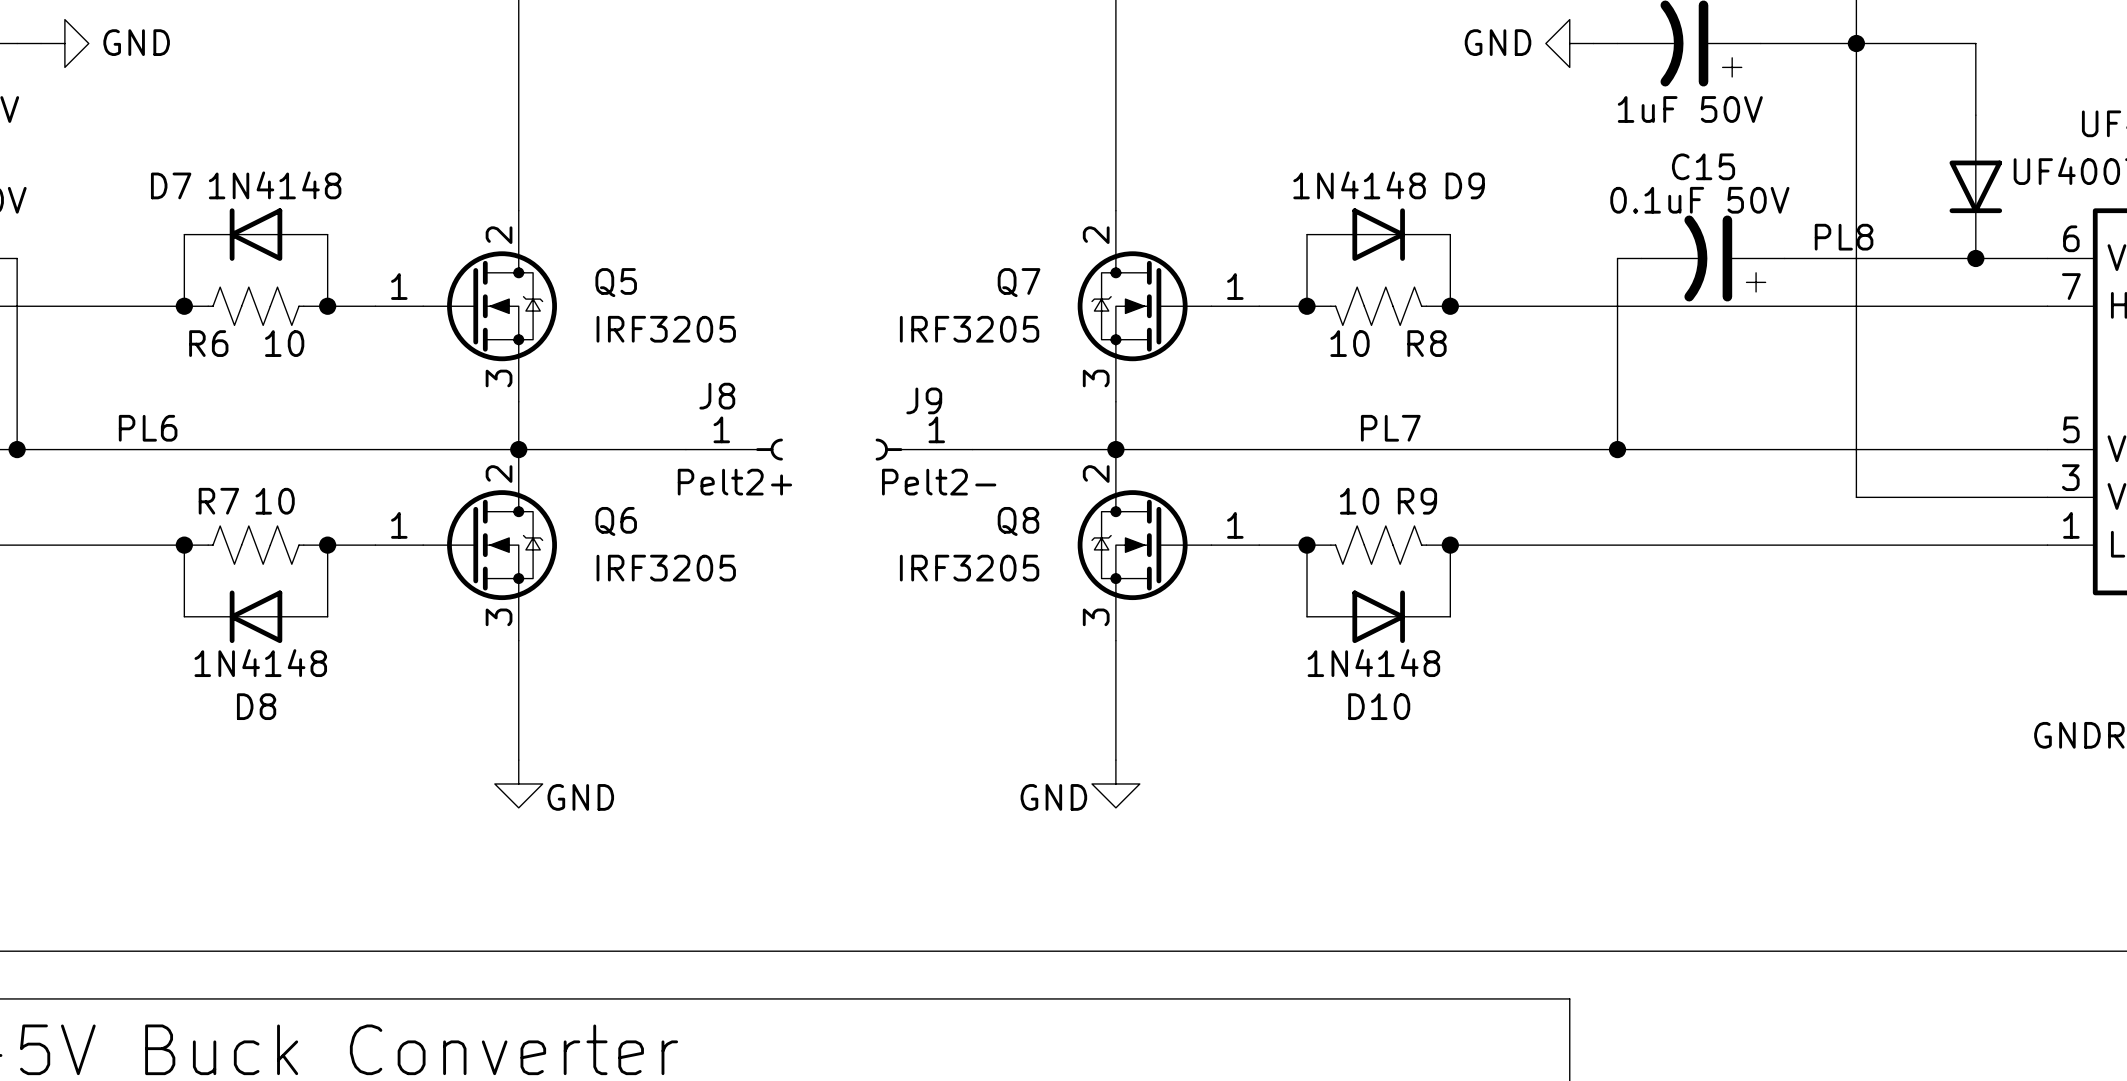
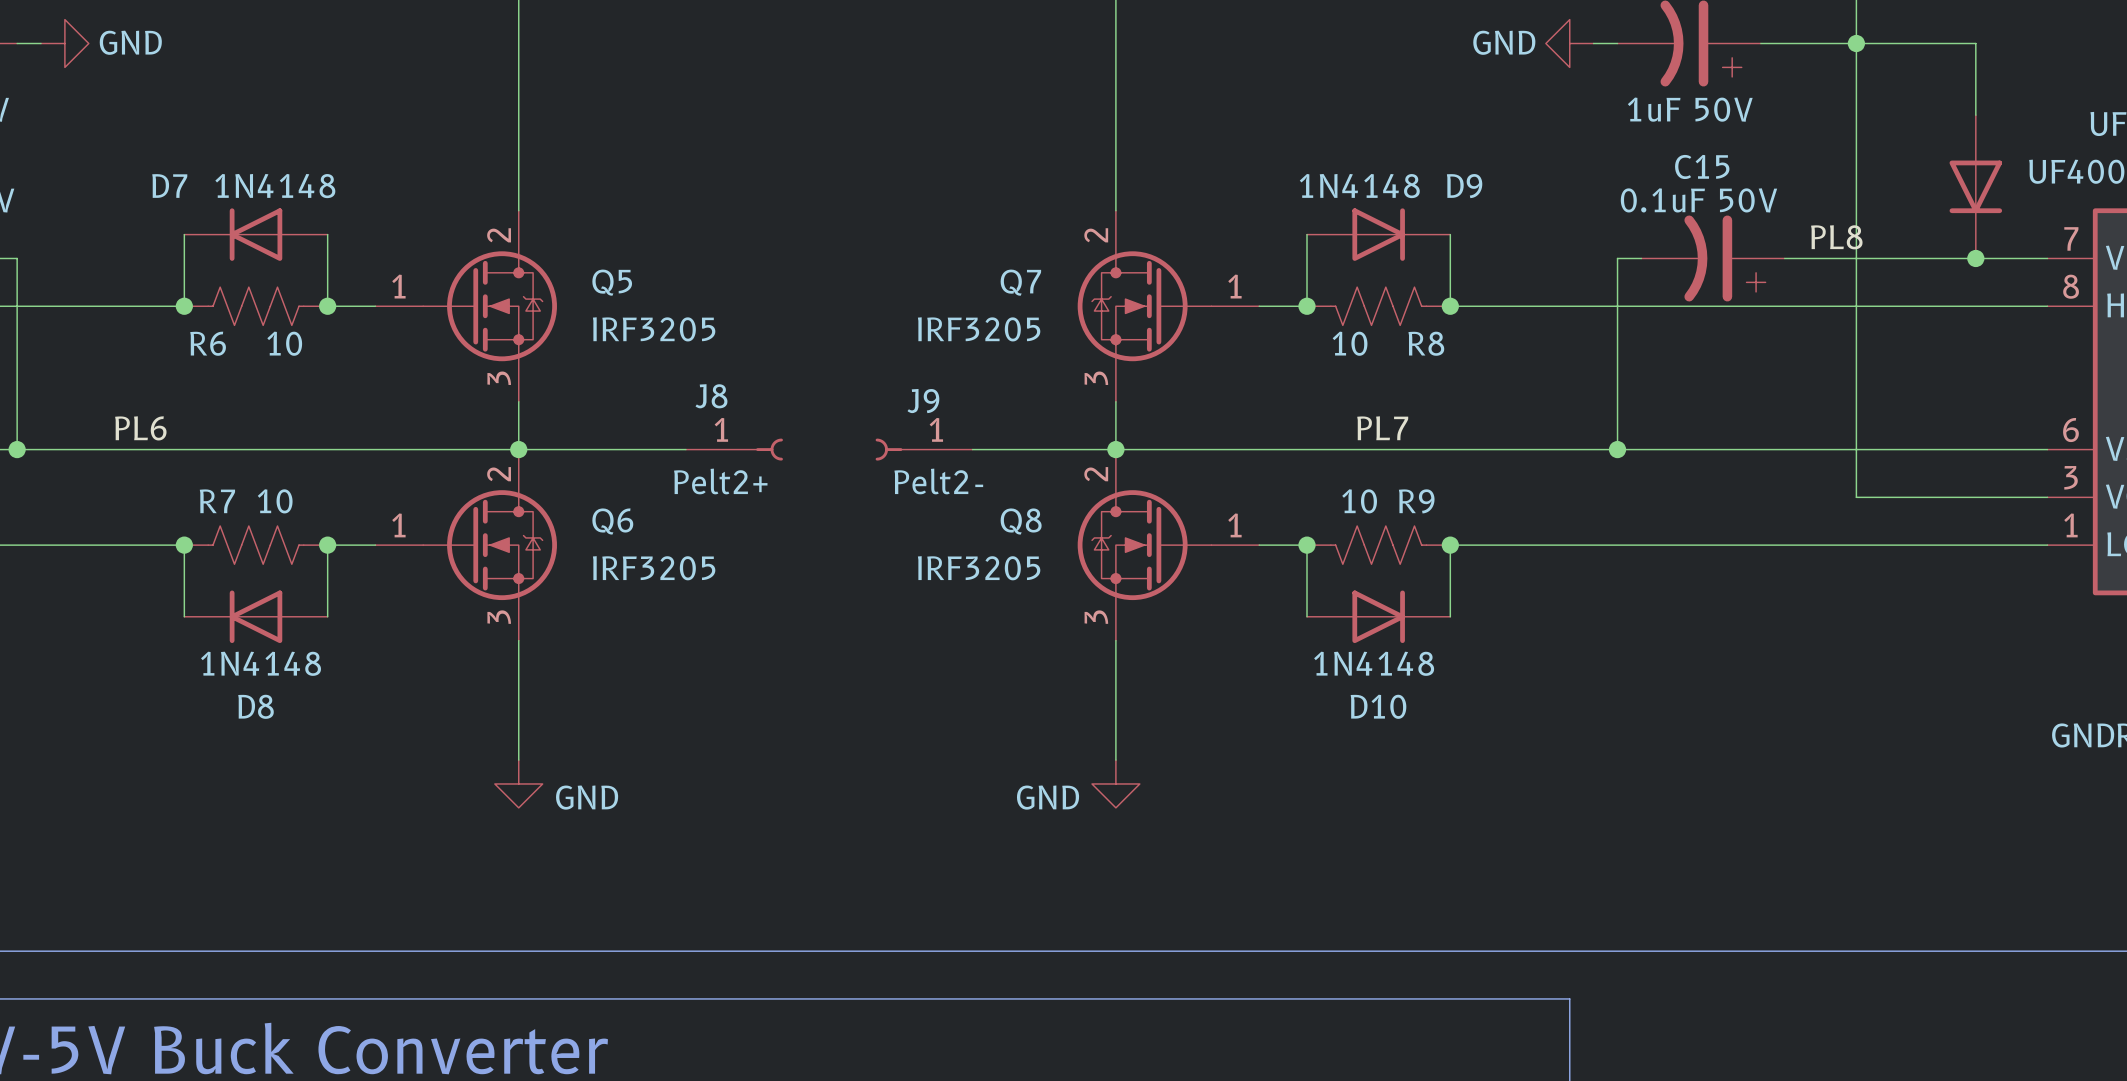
part pin number: 6 (2071, 238) -> 7 (2071, 238)
part pin number: 7 (2071, 286) -> 8 (2071, 286)
part pin number: 5 (2071, 429) -> 6 (2070, 430)

